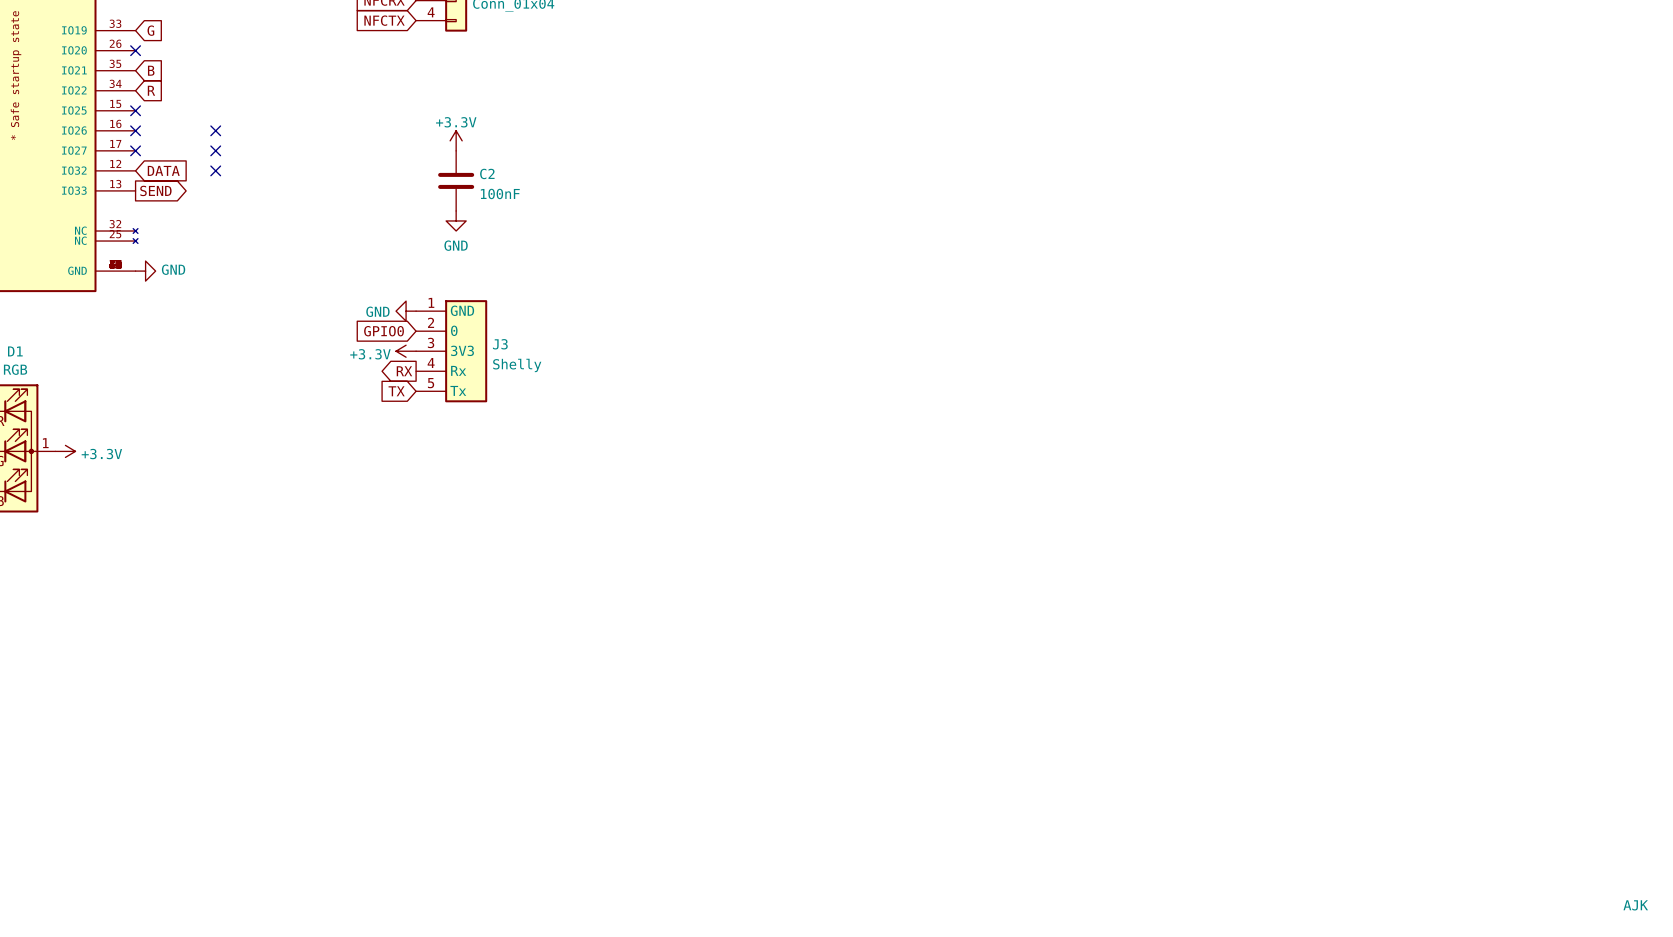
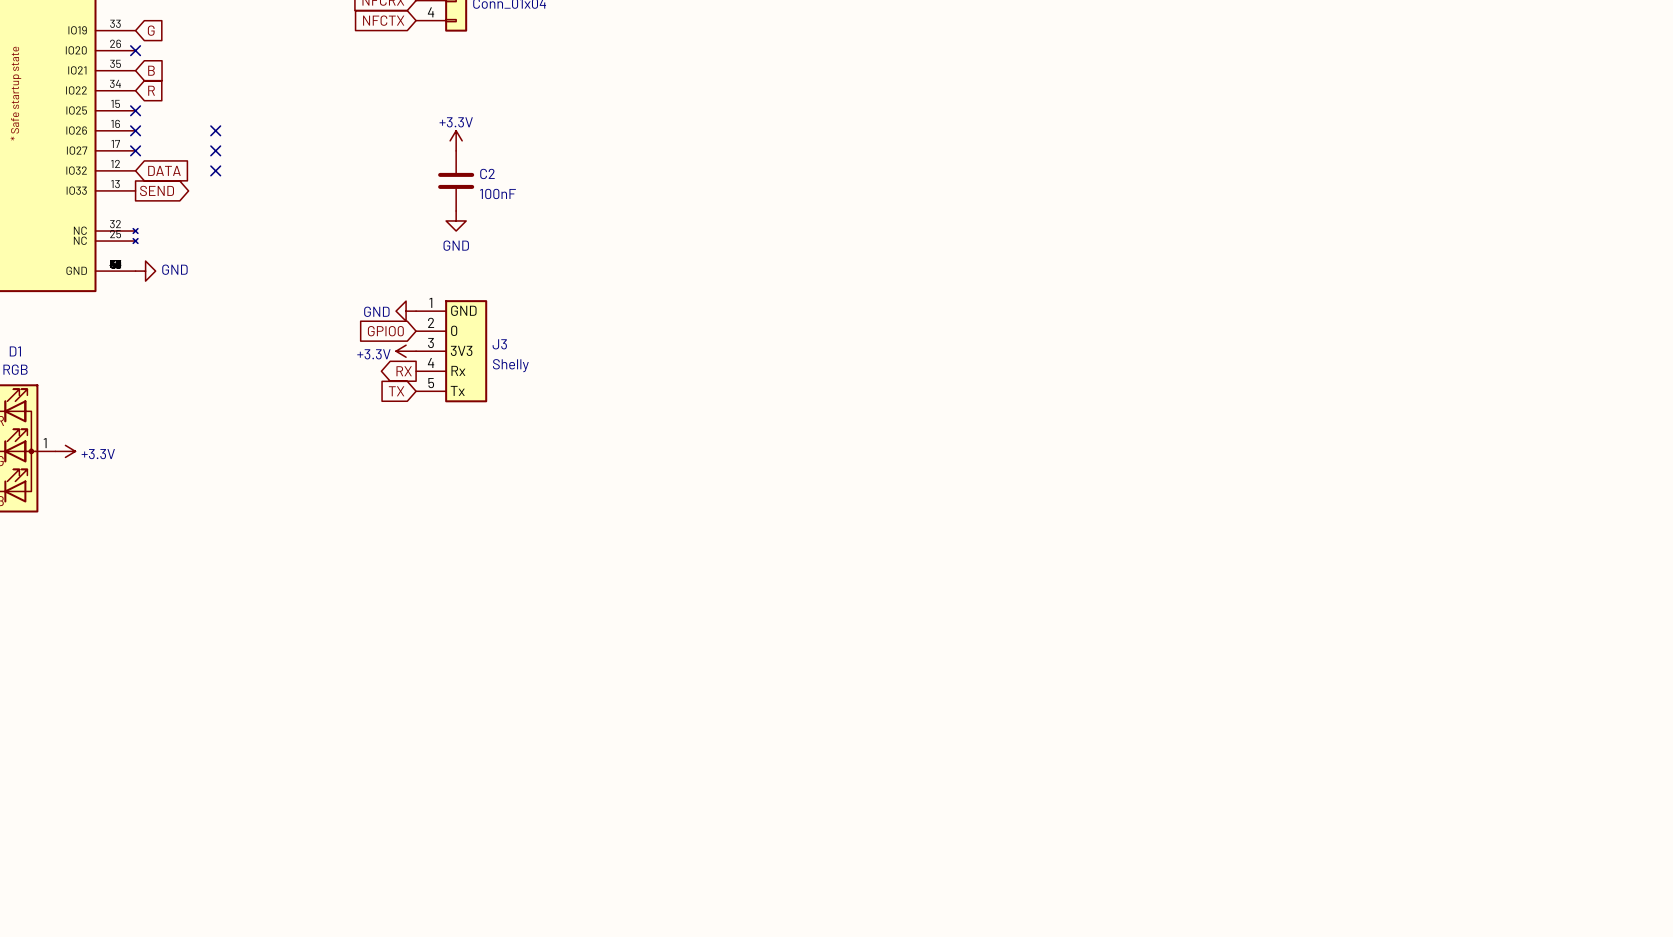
part: AJK (1635, 905) -> none

